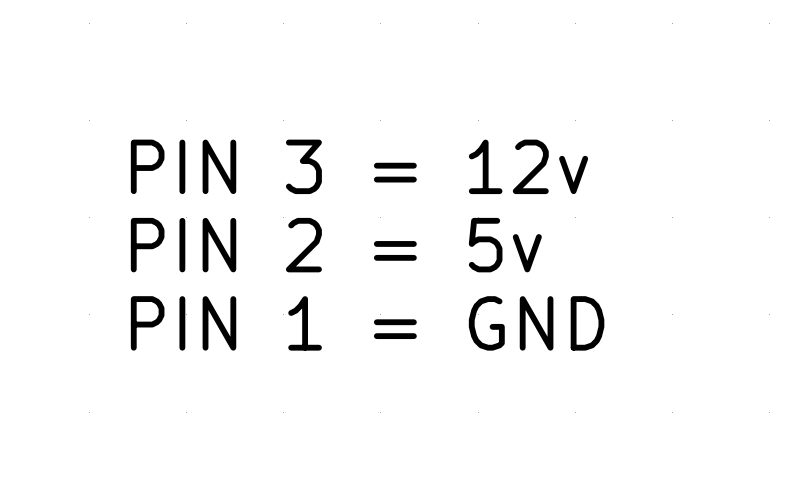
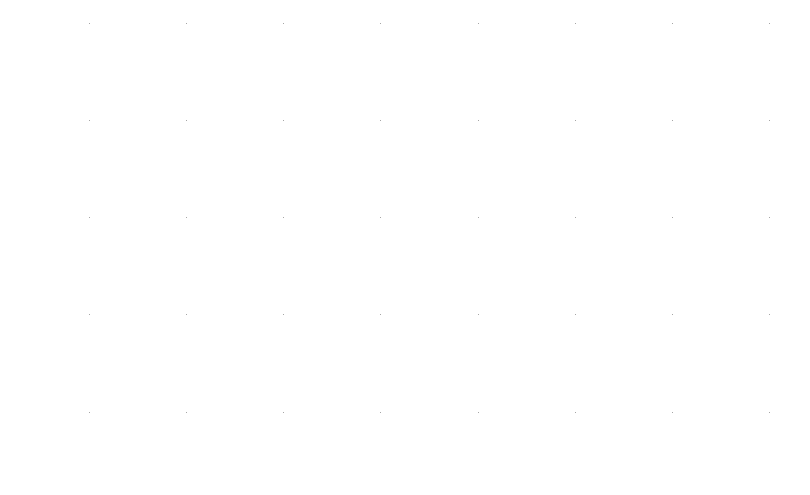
text: PIN 3 = 12v (359, 166) -> none
text: PIN 2 = 5v (336, 245) -> none
text: PIN 1 = GND (367, 323) -> none

